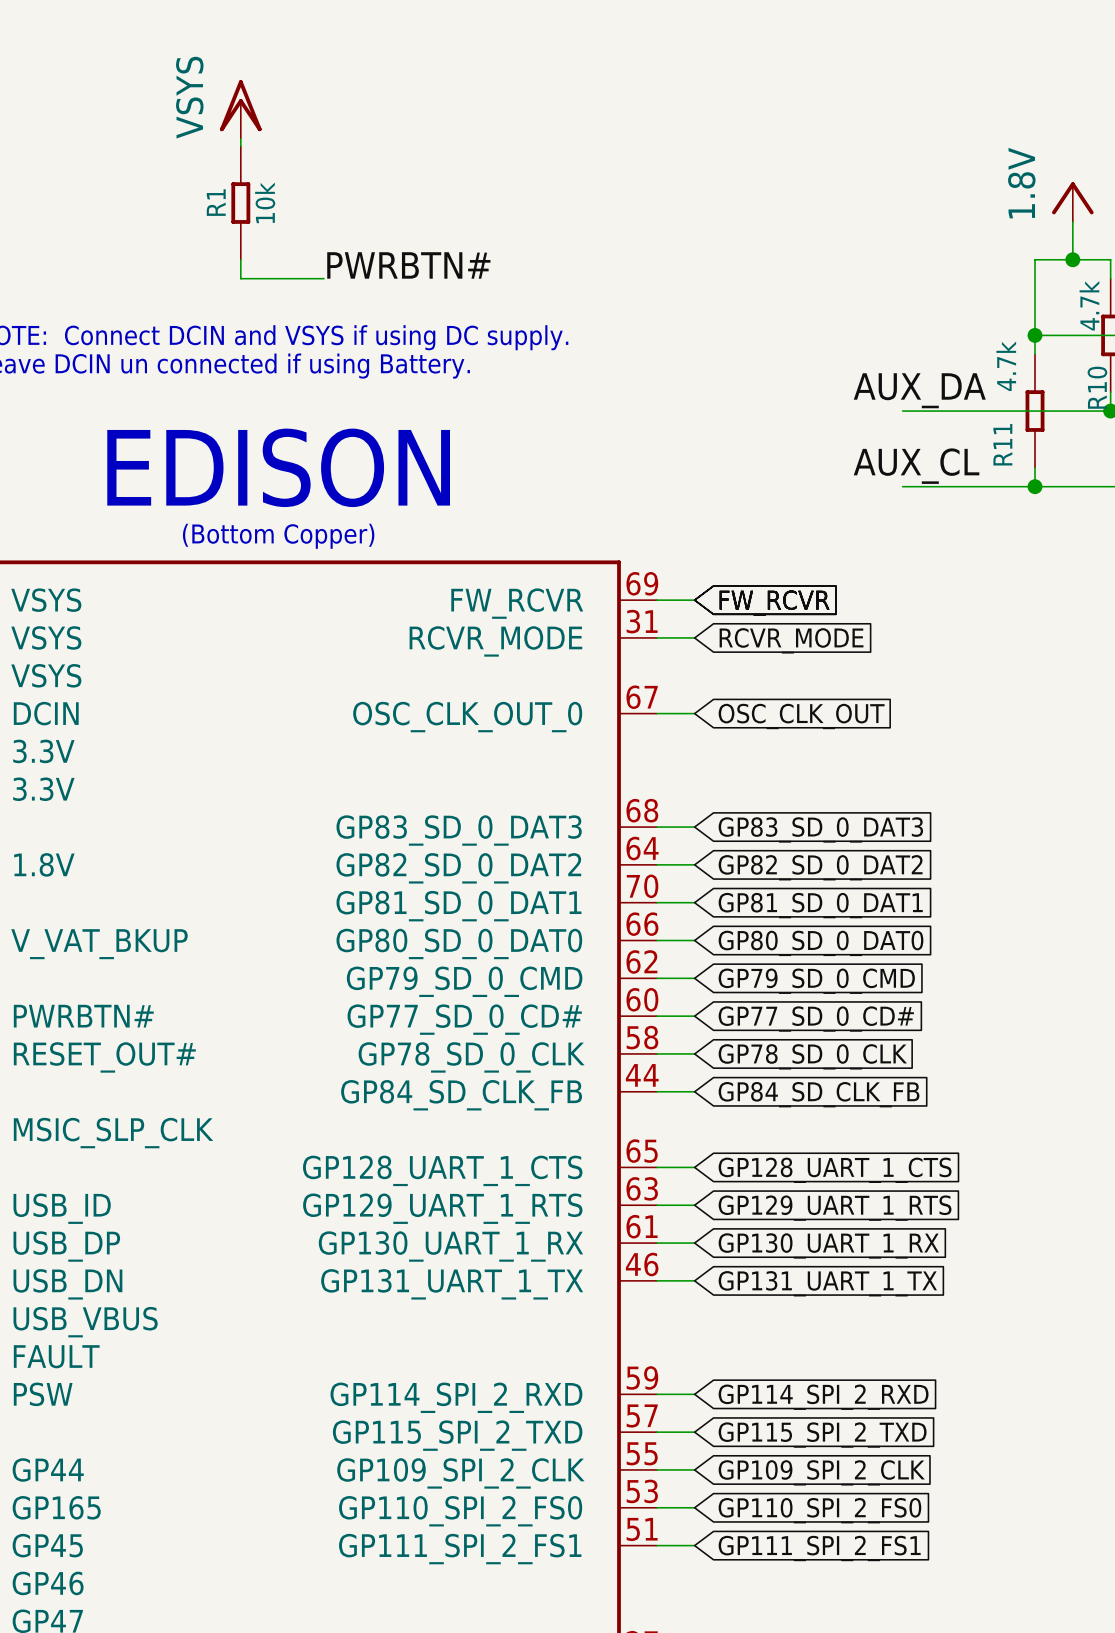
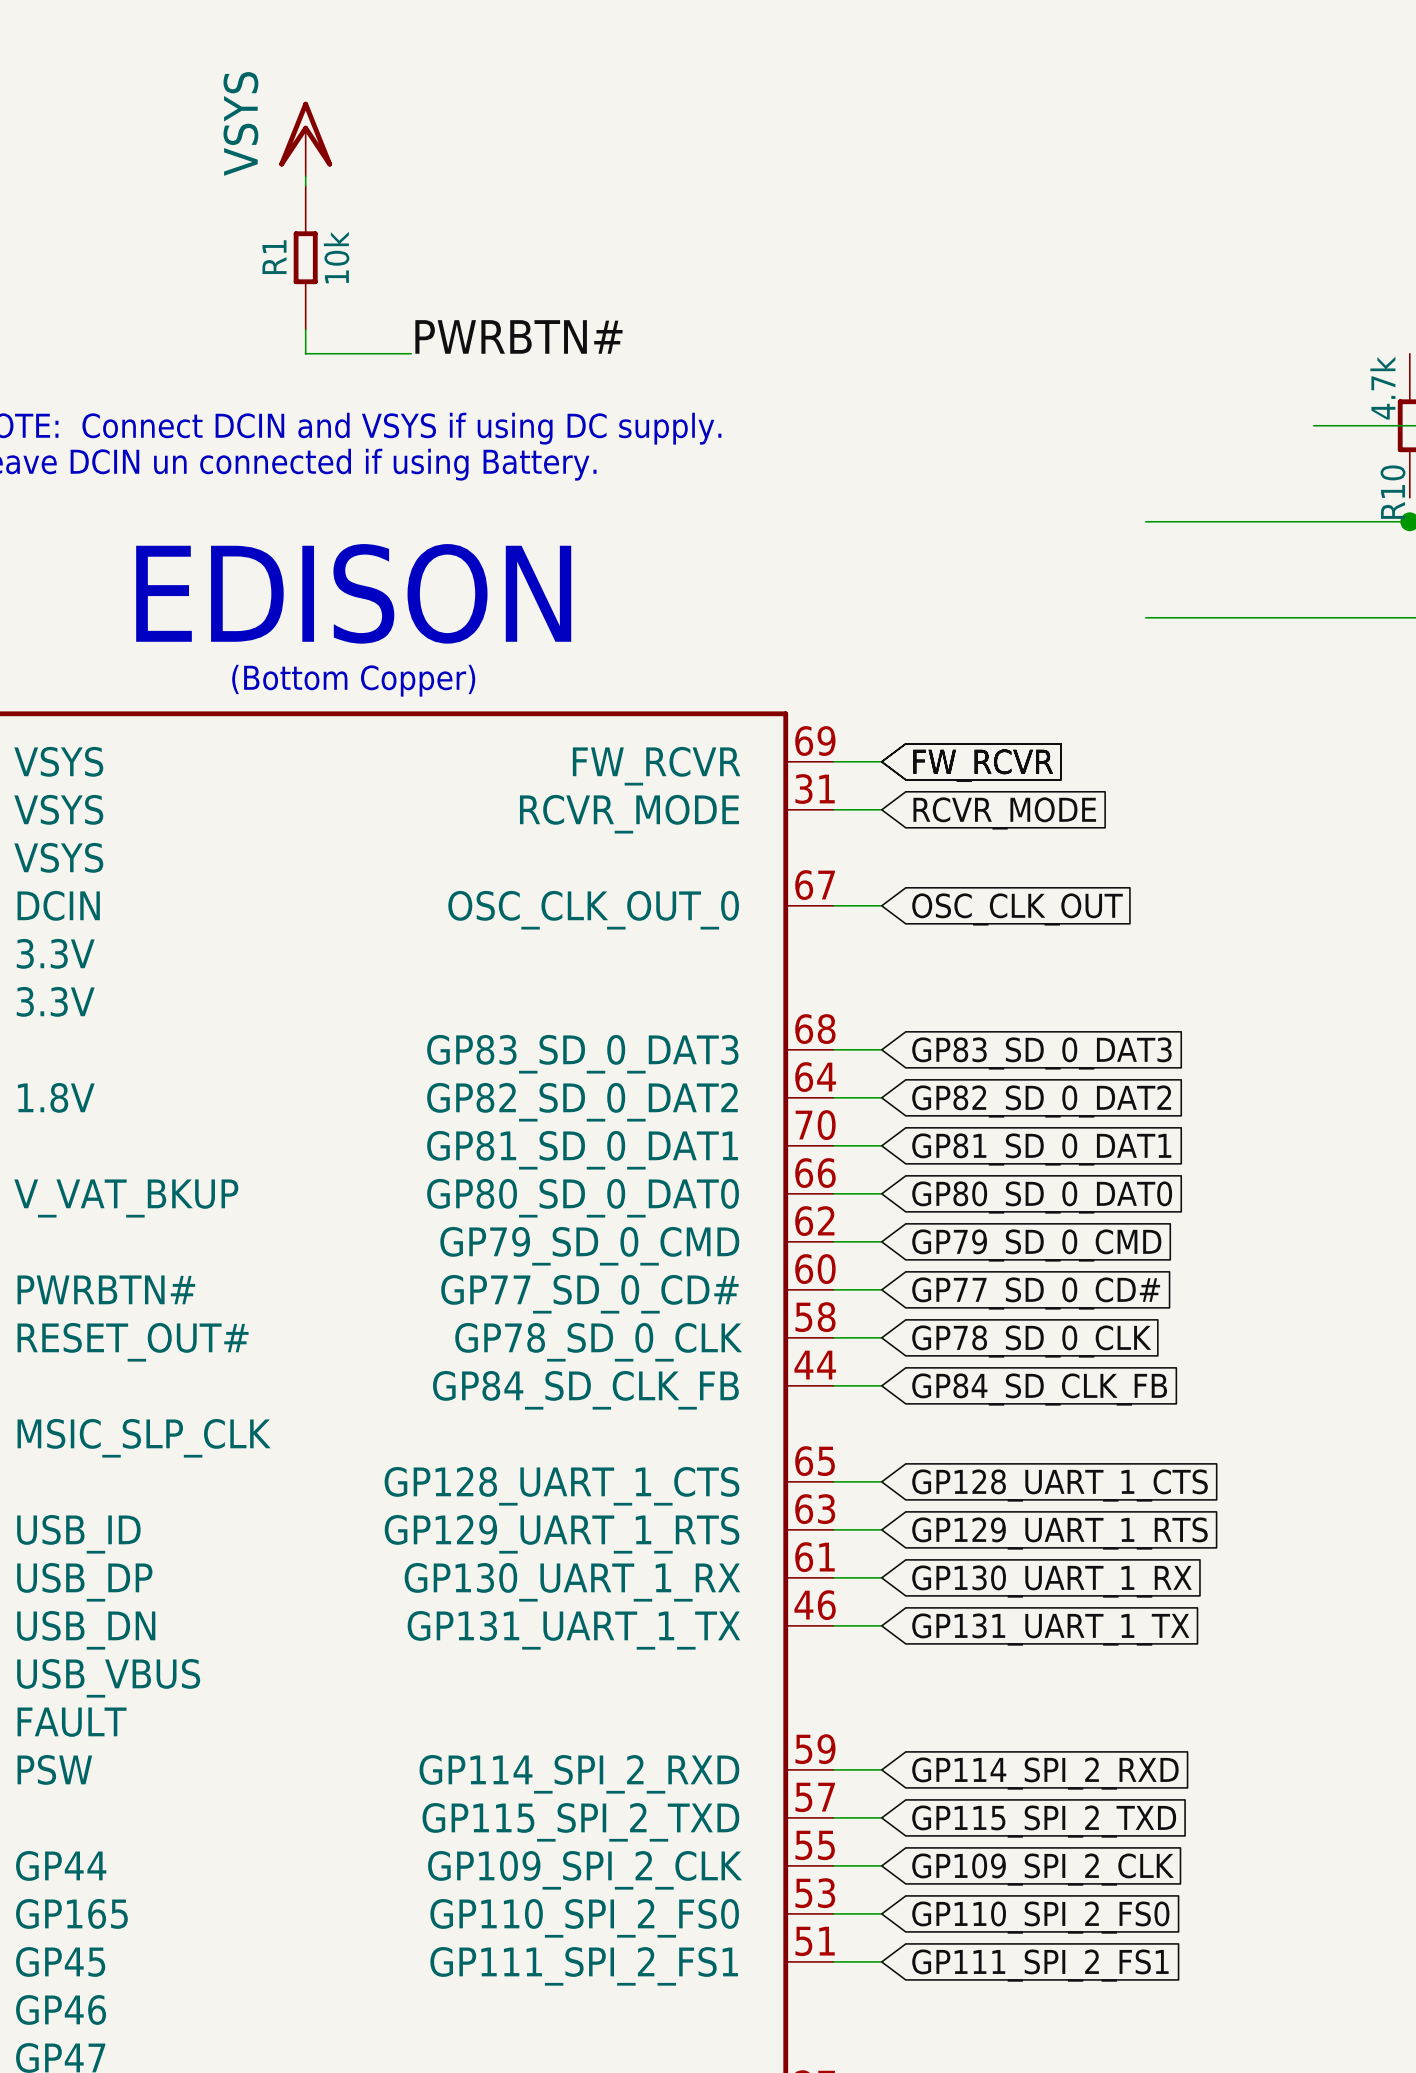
power symbol: 1.8V (1072, 202) -> none
wire: (1072, 221) (1072, 259) -> none
junction: (1072, 259) -> none
wire: (1110, 278) (1110, 259) (1035, 259) (1035, 354) -> none
junction: (1035, 335) -> none
label: AUX_DA (919, 390) -> none
wire: (1110, 392) (1110, 411) -> none
R11: 4.7k (1035, 411) -> none
label: AUX_CL (916, 466) -> none
wire: (1035, 467) (1035, 486) -> none
junction: (1035, 486) -> none

